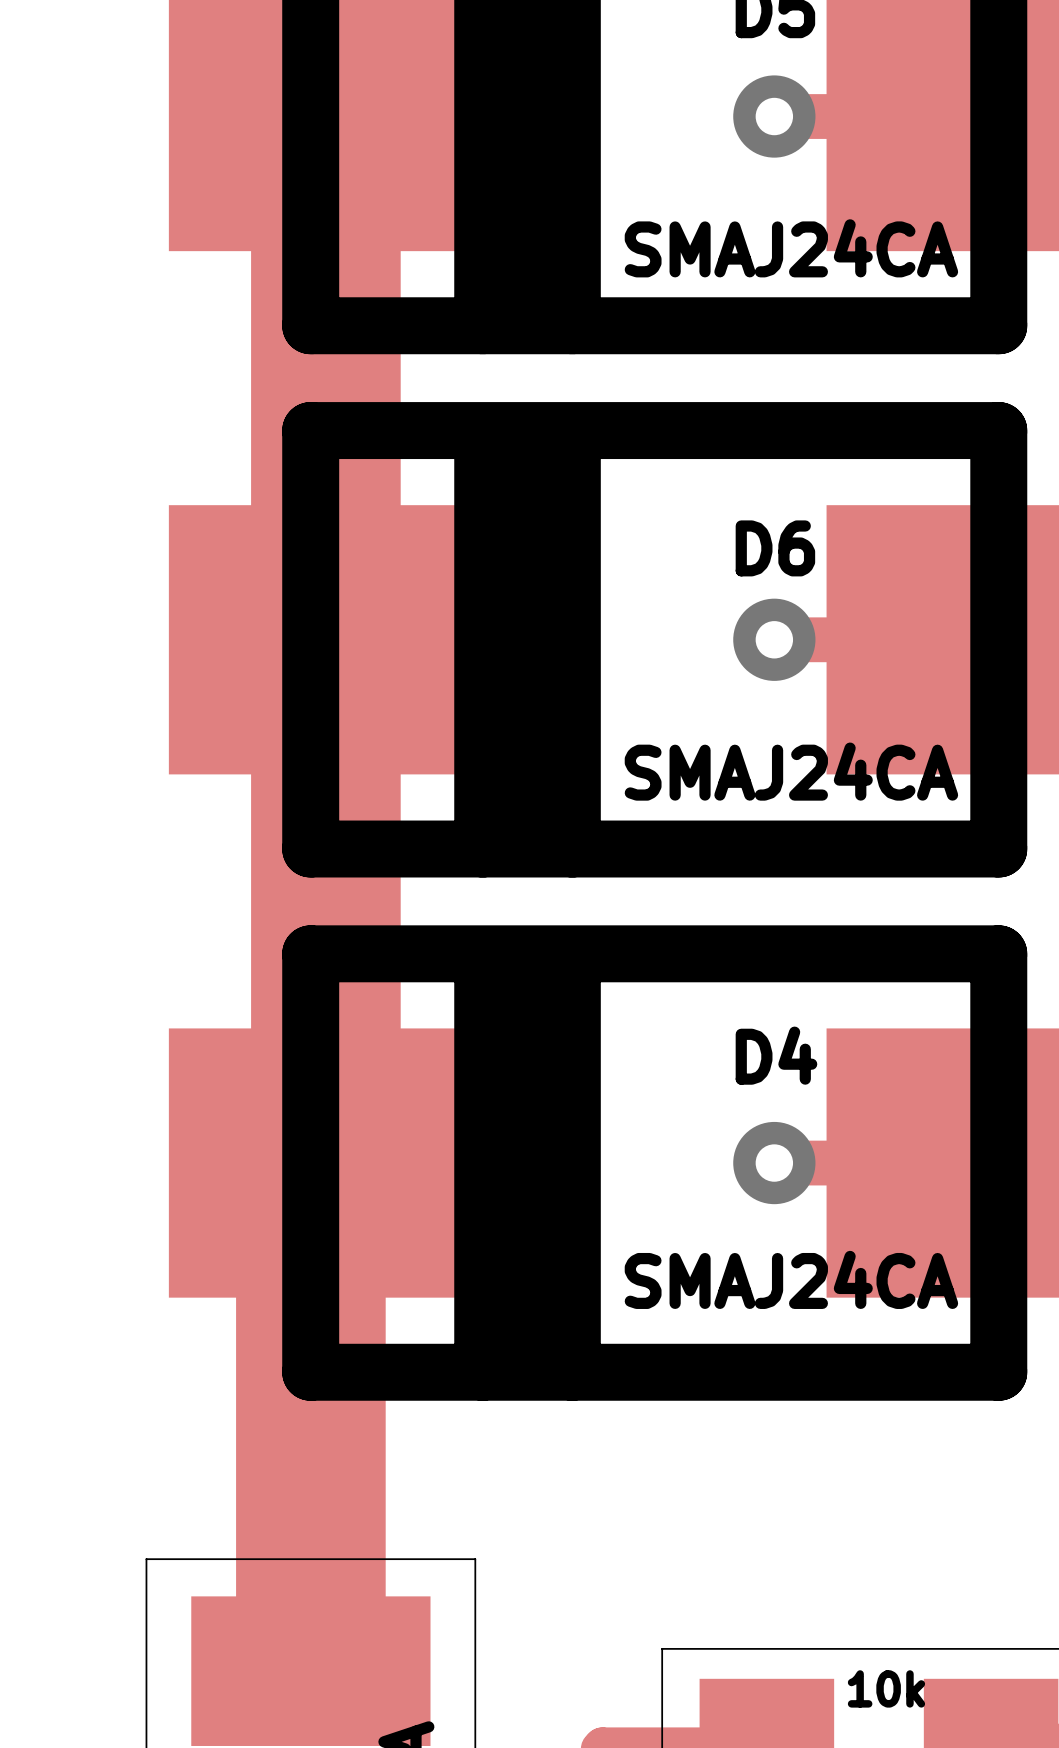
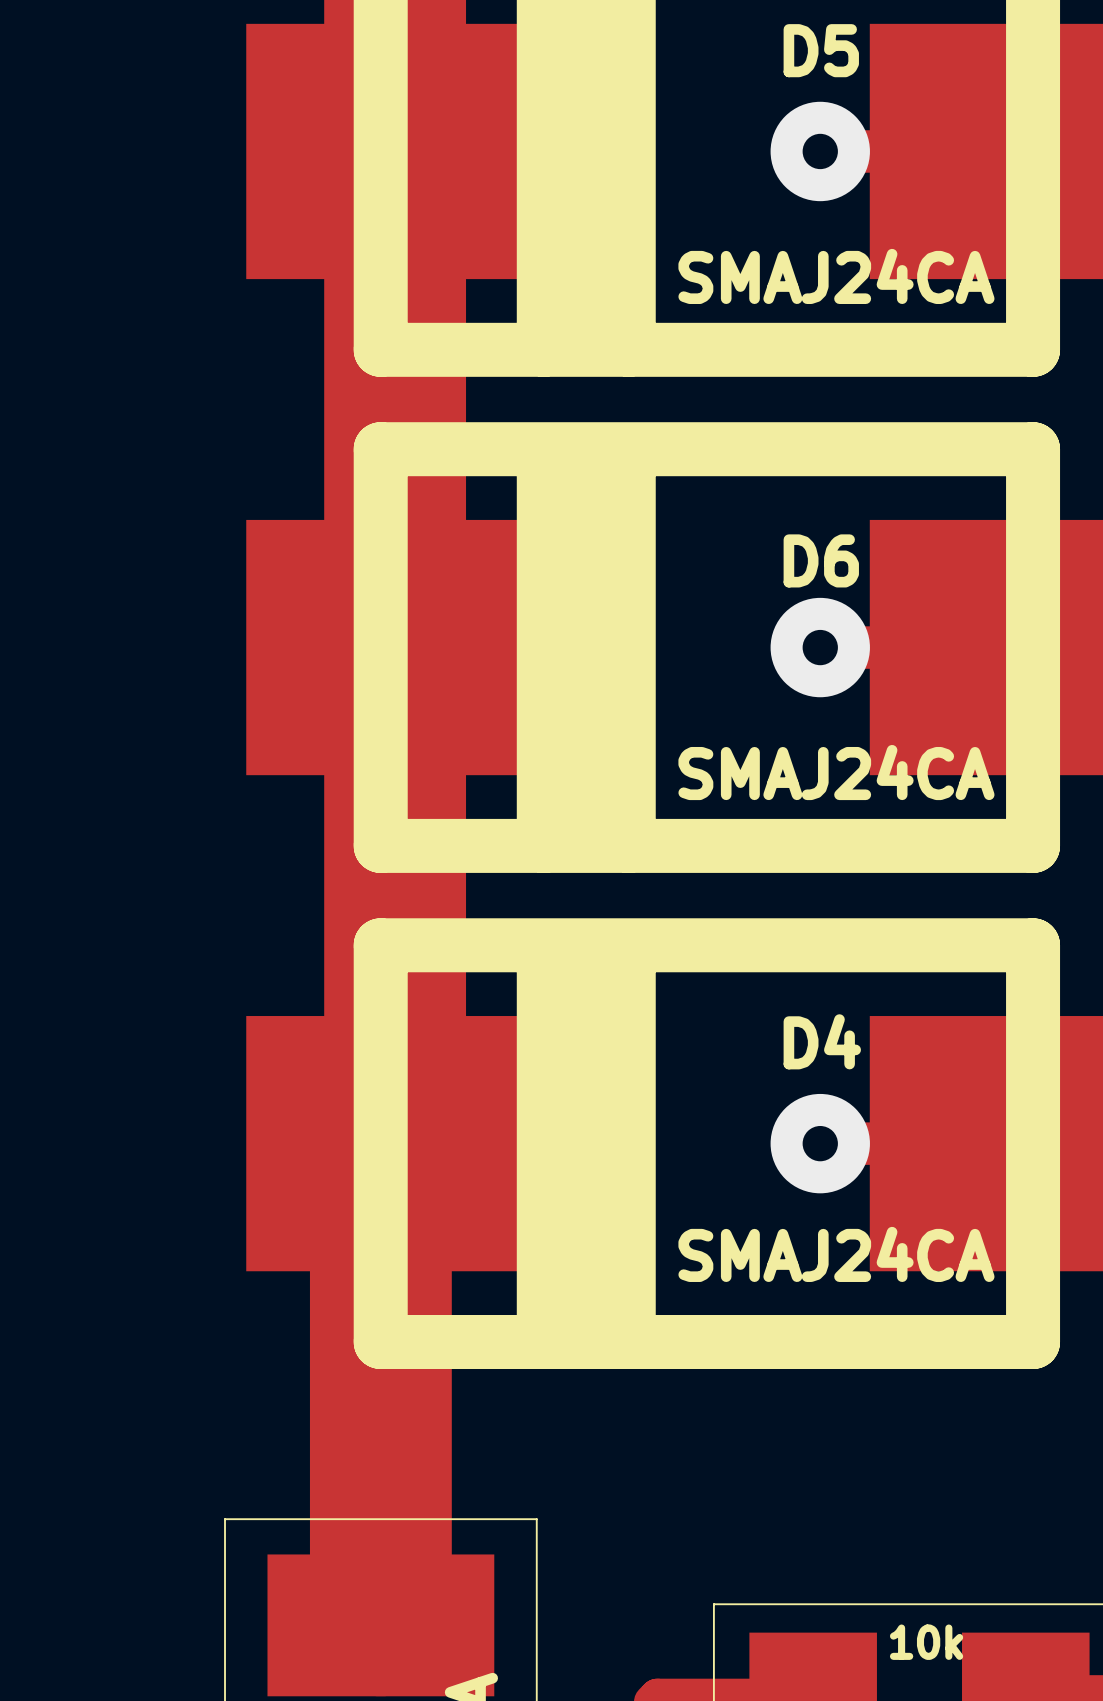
via size: [733, 75, 816, 158] -> [770, 101, 870, 202]
via size: [733, 598, 816, 681] -> [770, 597, 870, 698]
via size: [733, 1121, 816, 1205] -> [770, 1093, 870, 1194]

